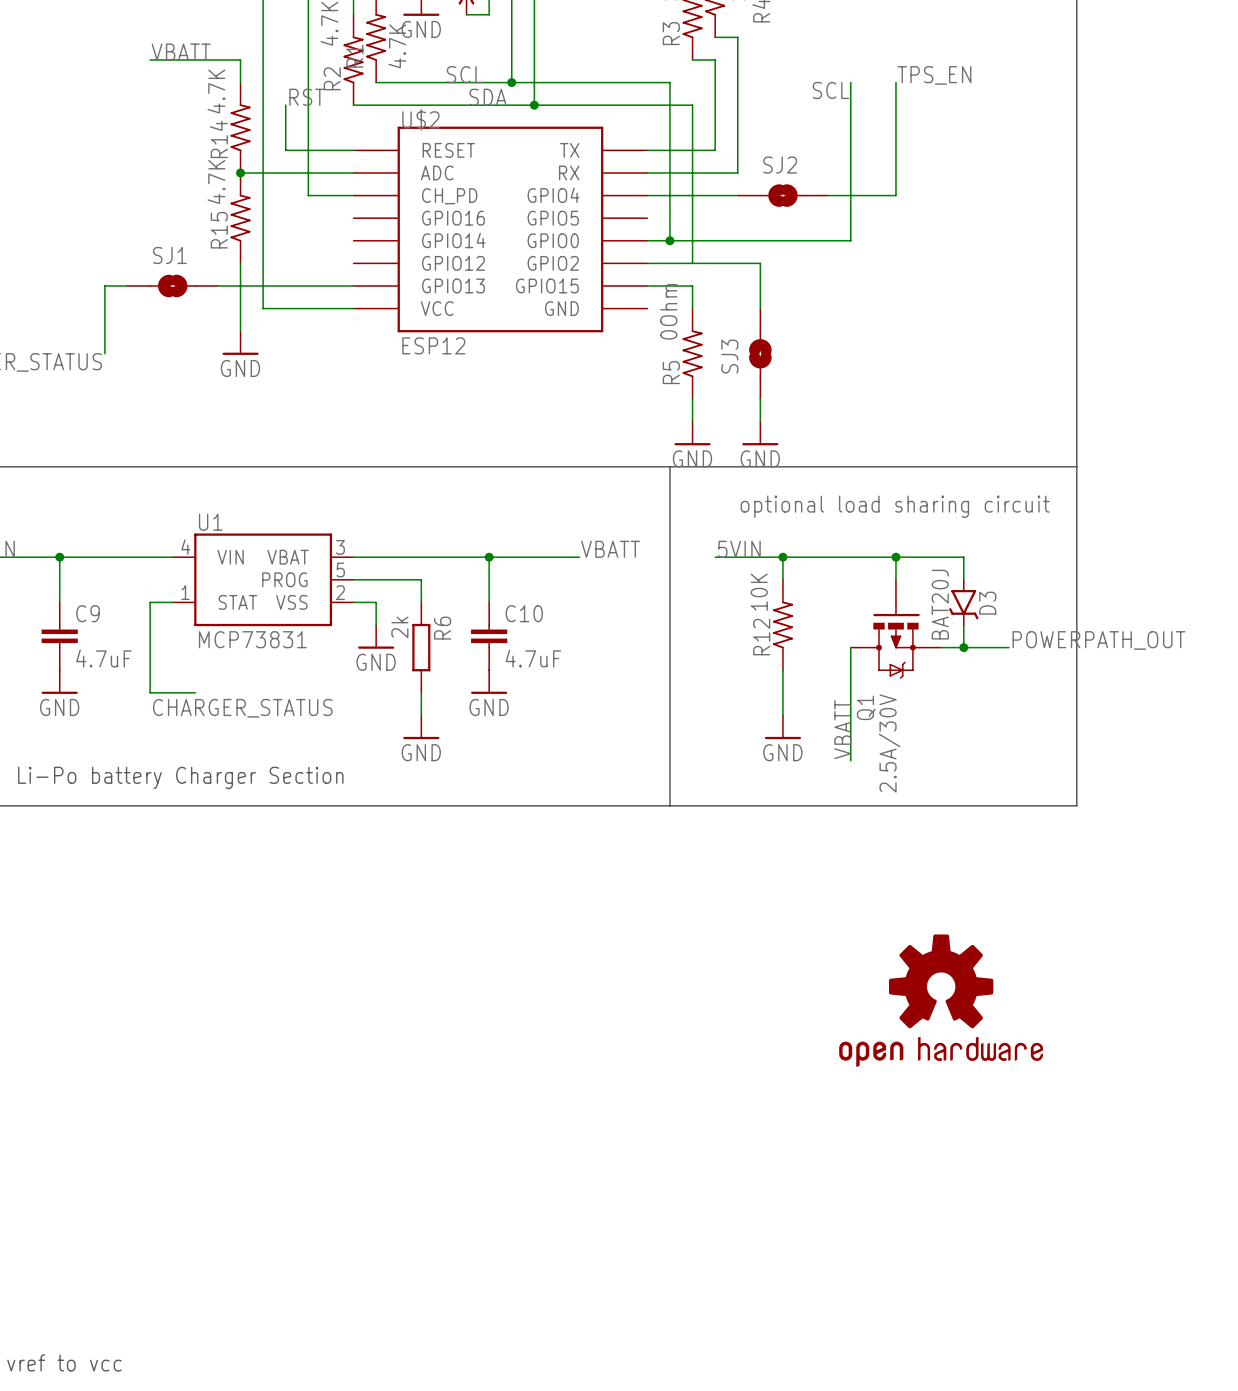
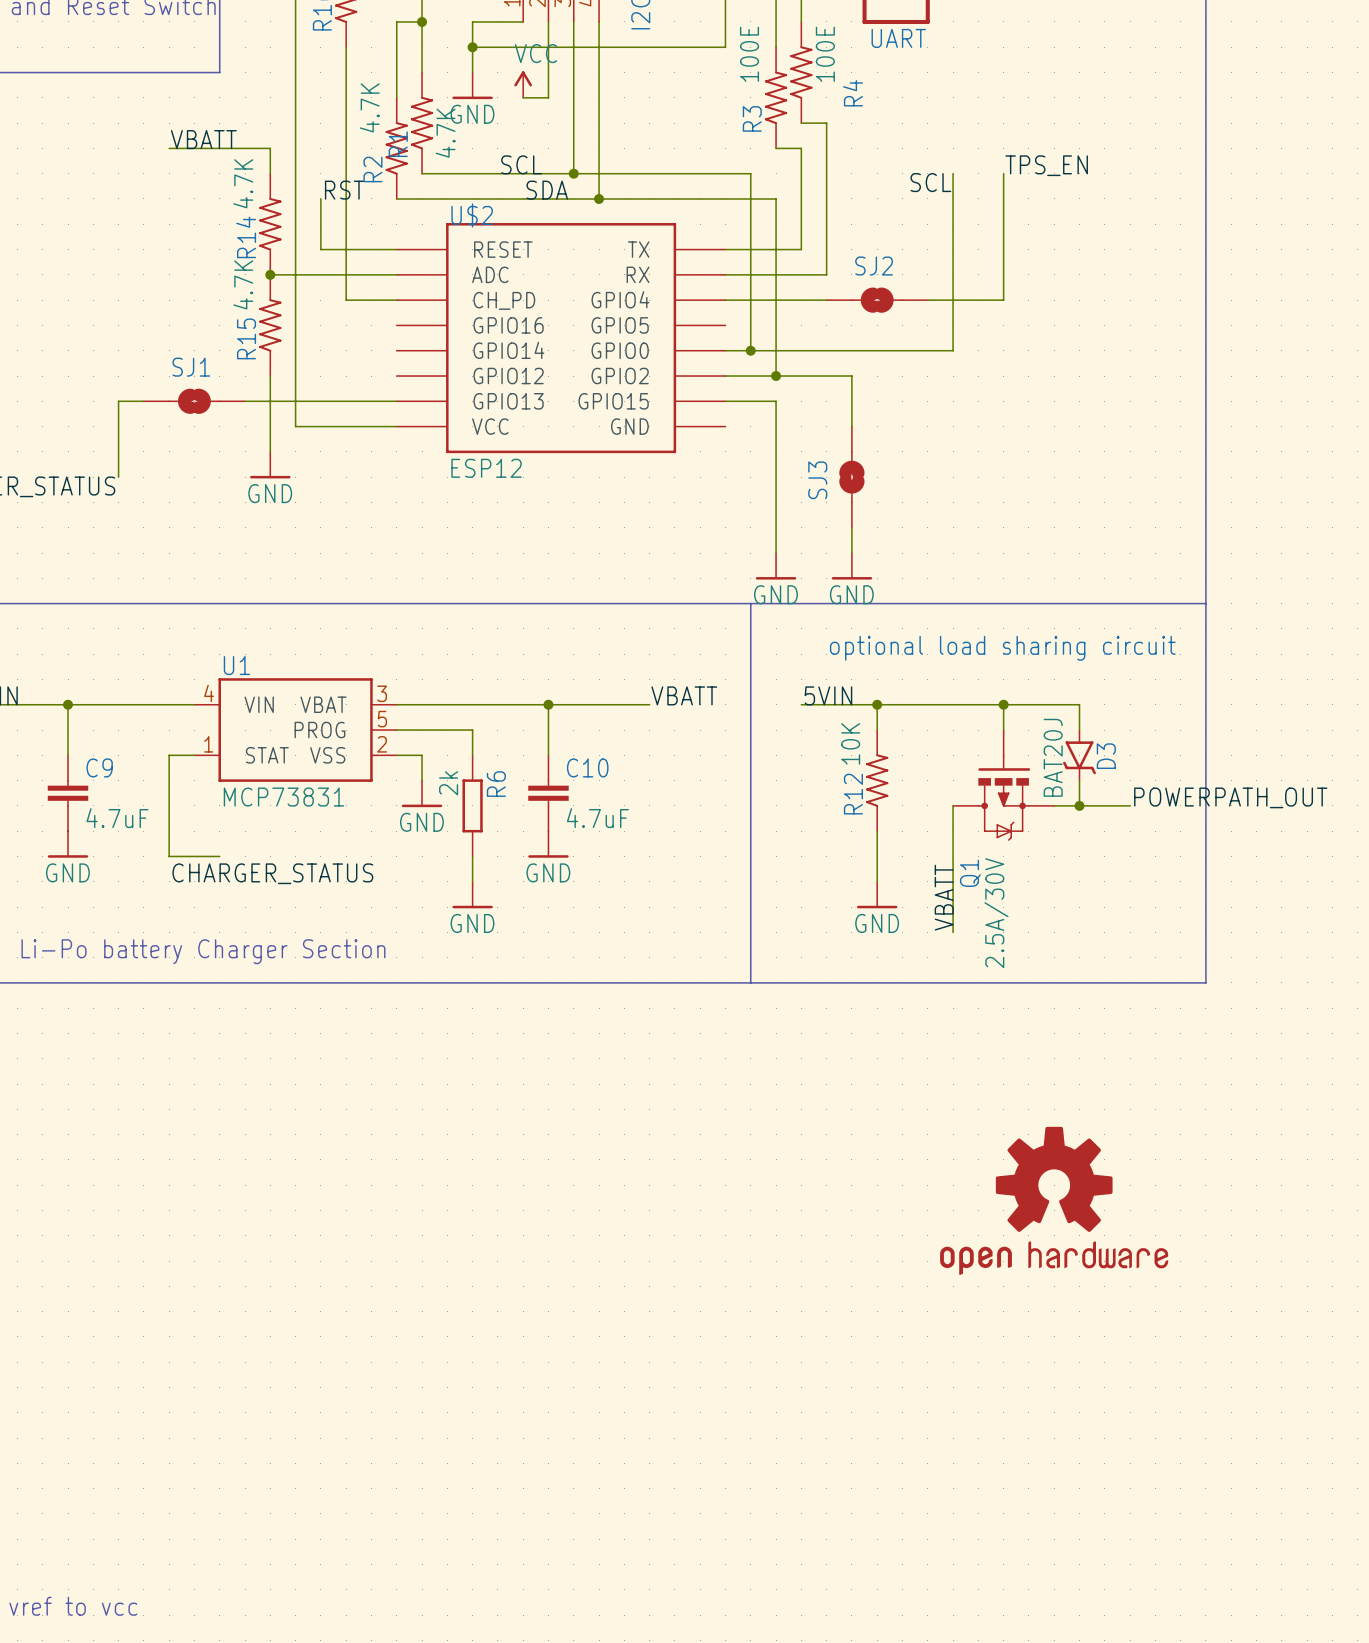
junction: none -> (776, 376)
R5: 0Ohm (692, 353) -> none

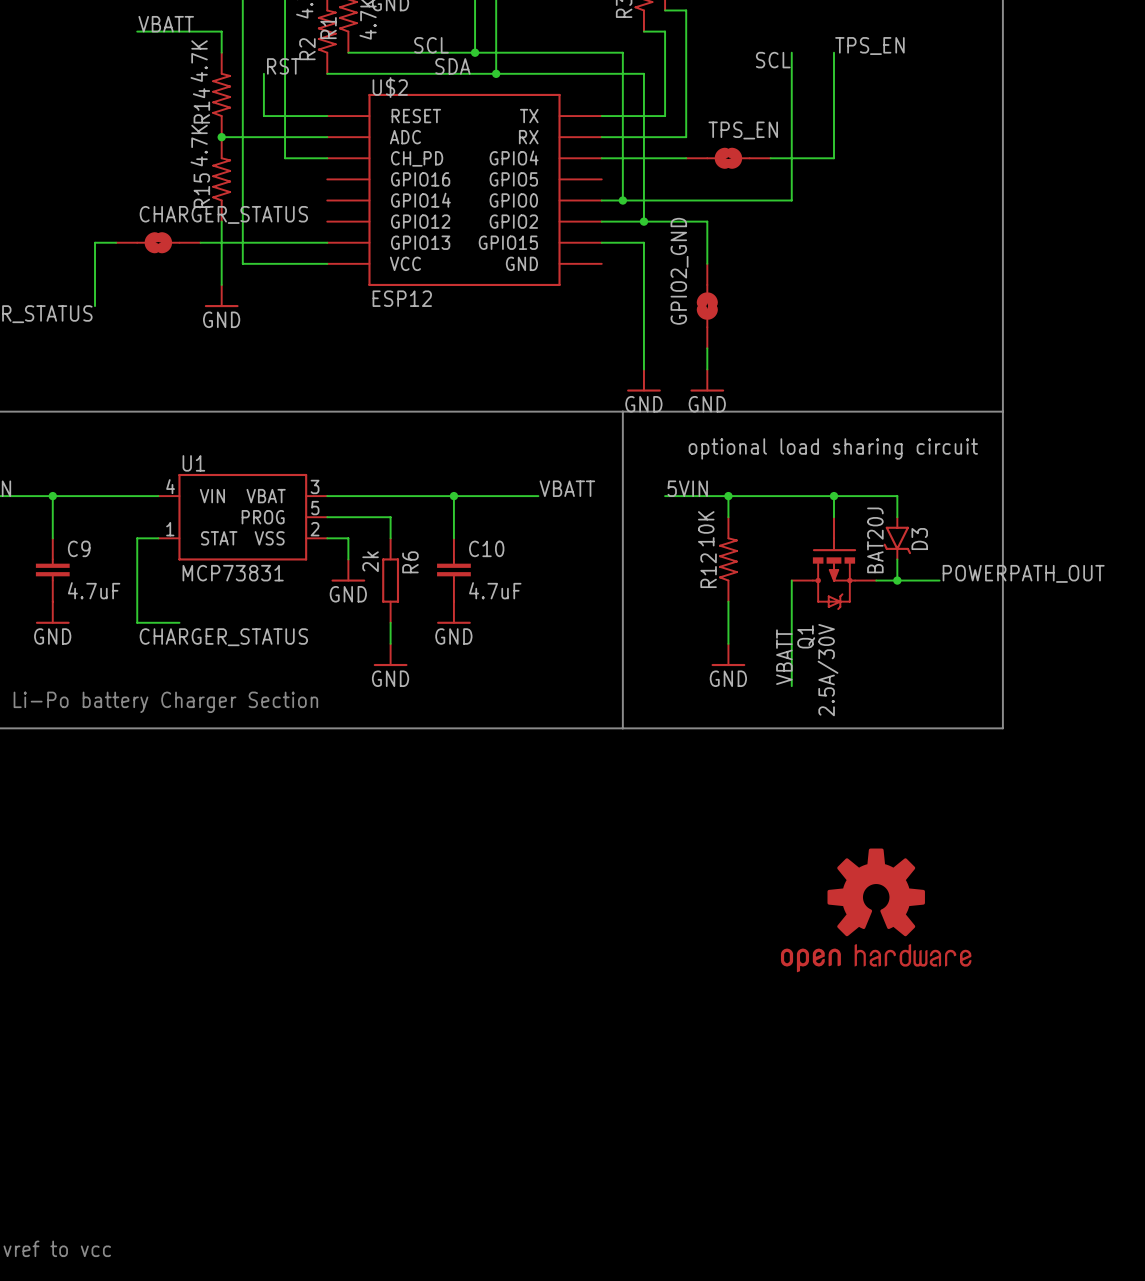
SJ2 name: SJ2 (874, 266) -> TPS_EN (743, 130)
SJ1 name: SJ1 (191, 367) -> CHARGER_STATUS (223, 214)
SJ3 name: SJ3 (817, 480) -> GPIO2_GND (679, 271)

